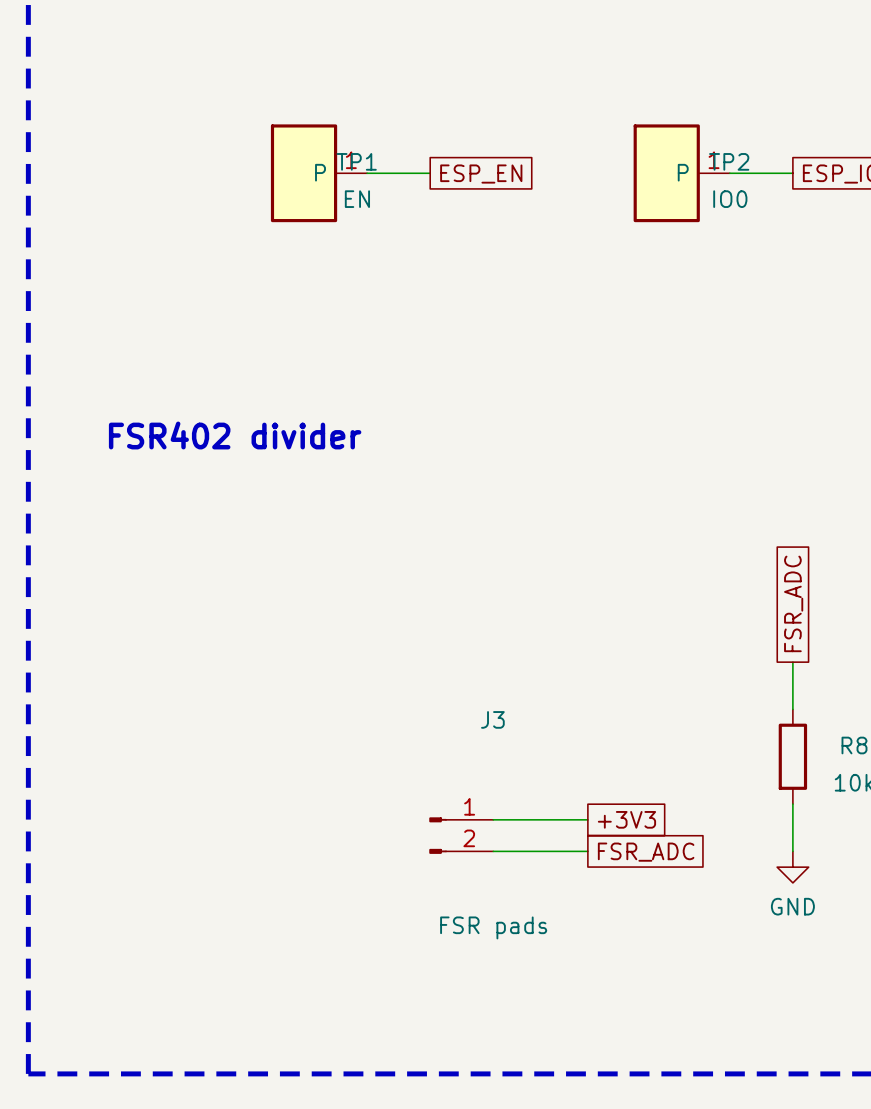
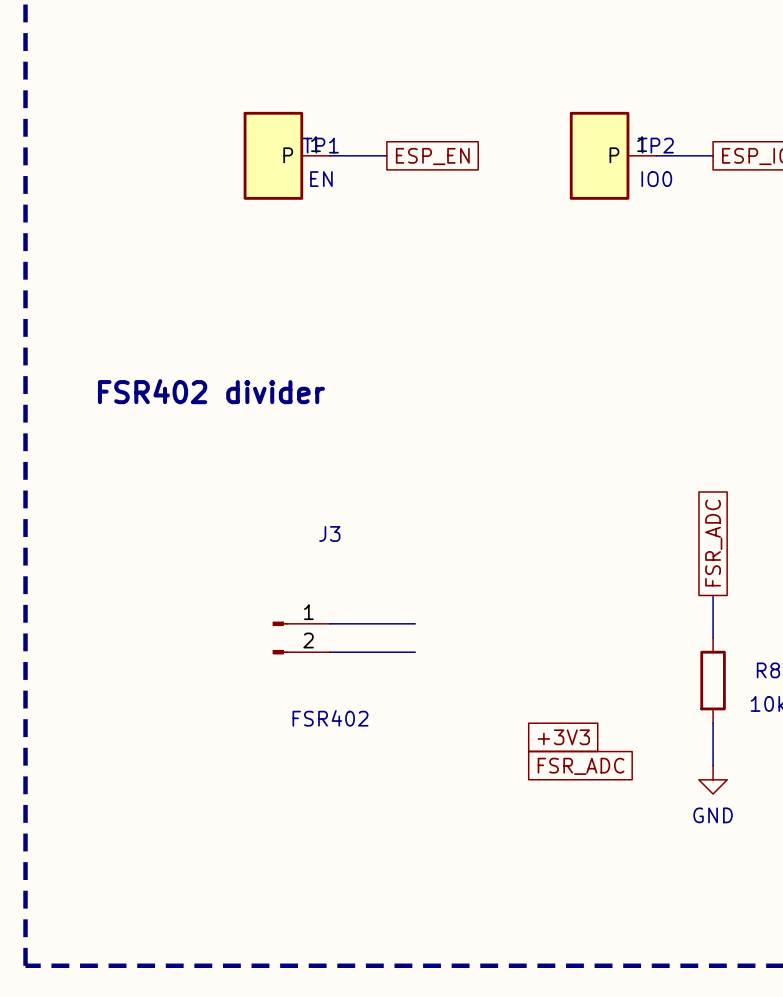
wire: (493, 819) (587, 819) -> (330, 623) (415, 623)
J3 position: (461, 835) -> (301, 638)
wire: (493, 851) (587, 851) -> (330, 652) (415, 652)
J3 value: FSR pads (493, 927) -> FSR402 (330, 718)

